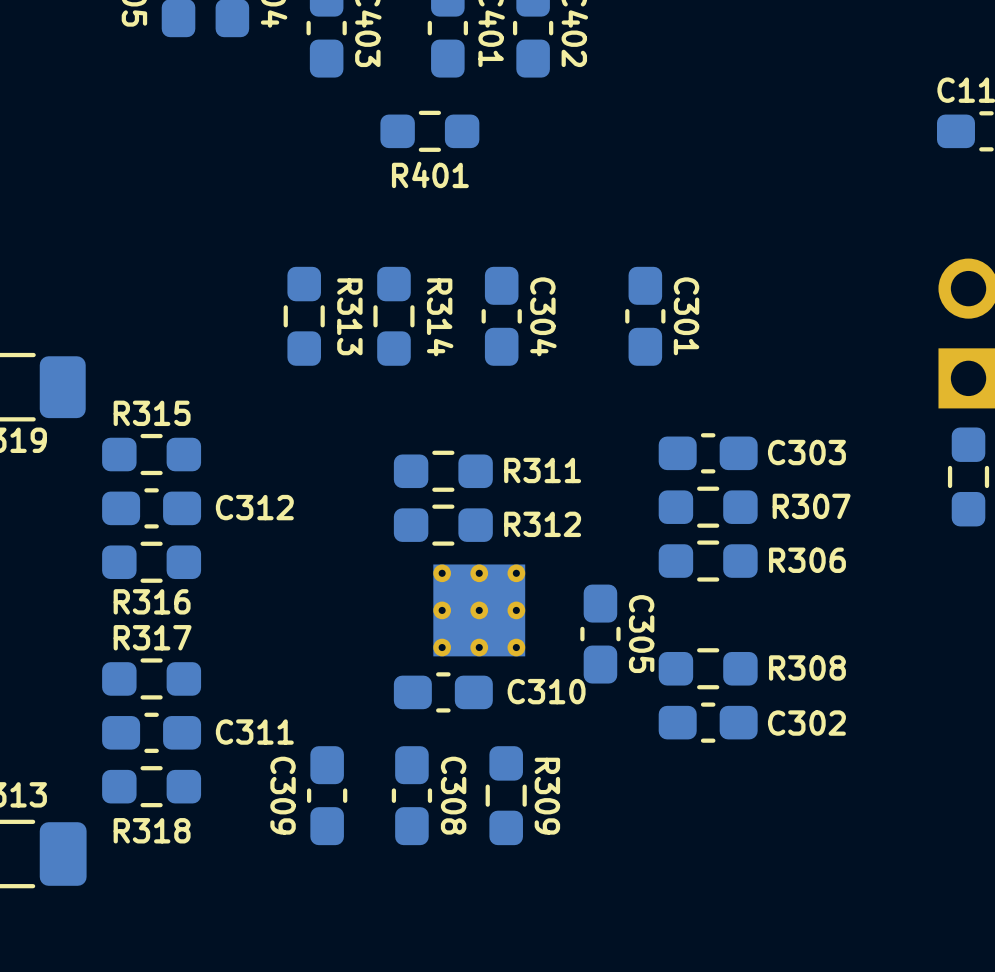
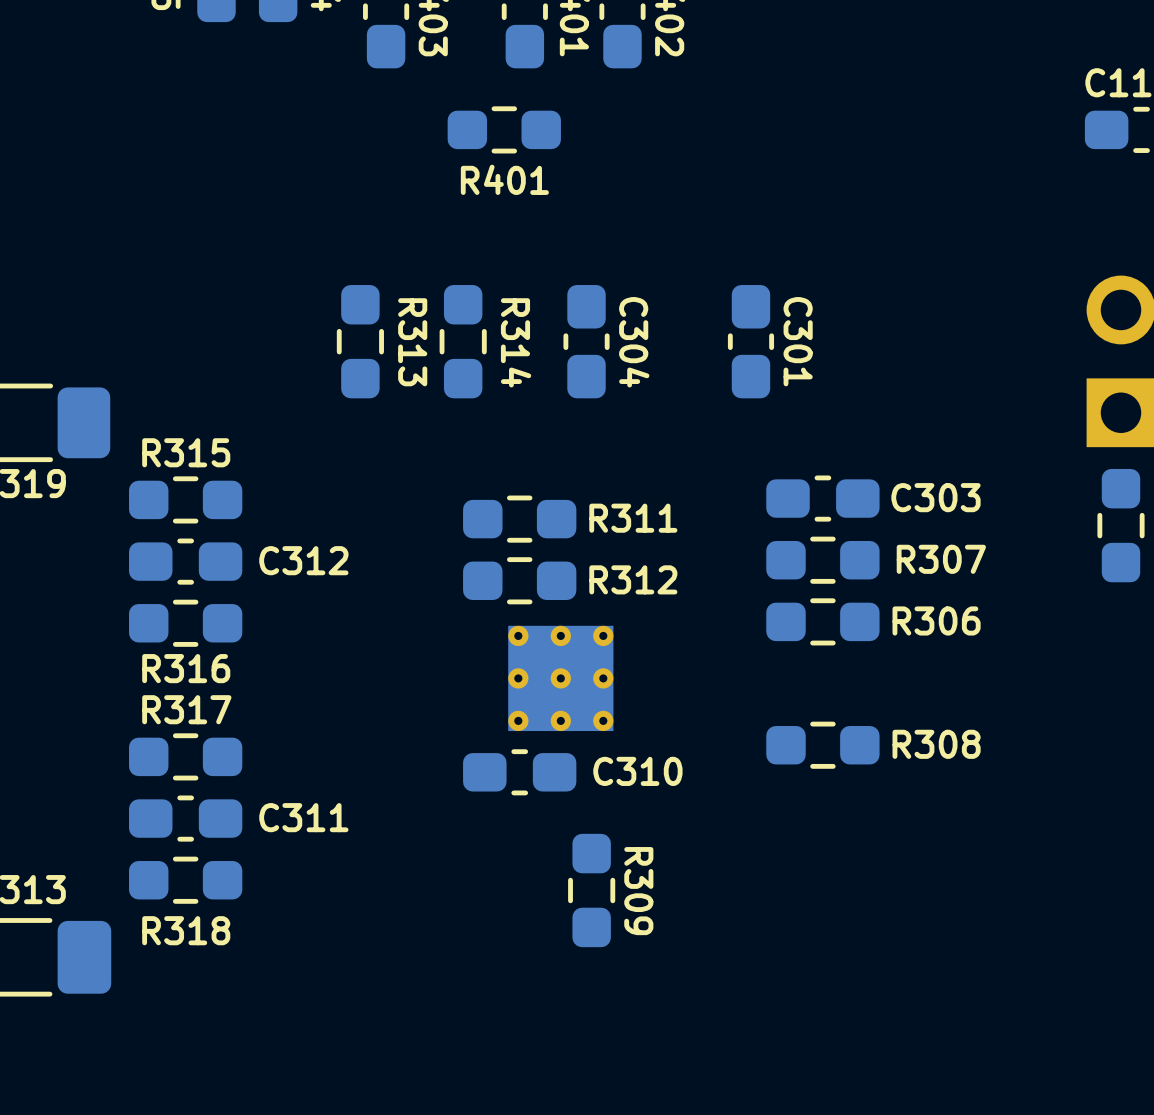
C305: (600, 634) -> none
C302: (708, 722) -> none
C309: (327, 795) -> none
C308: (411, 795) -> none

